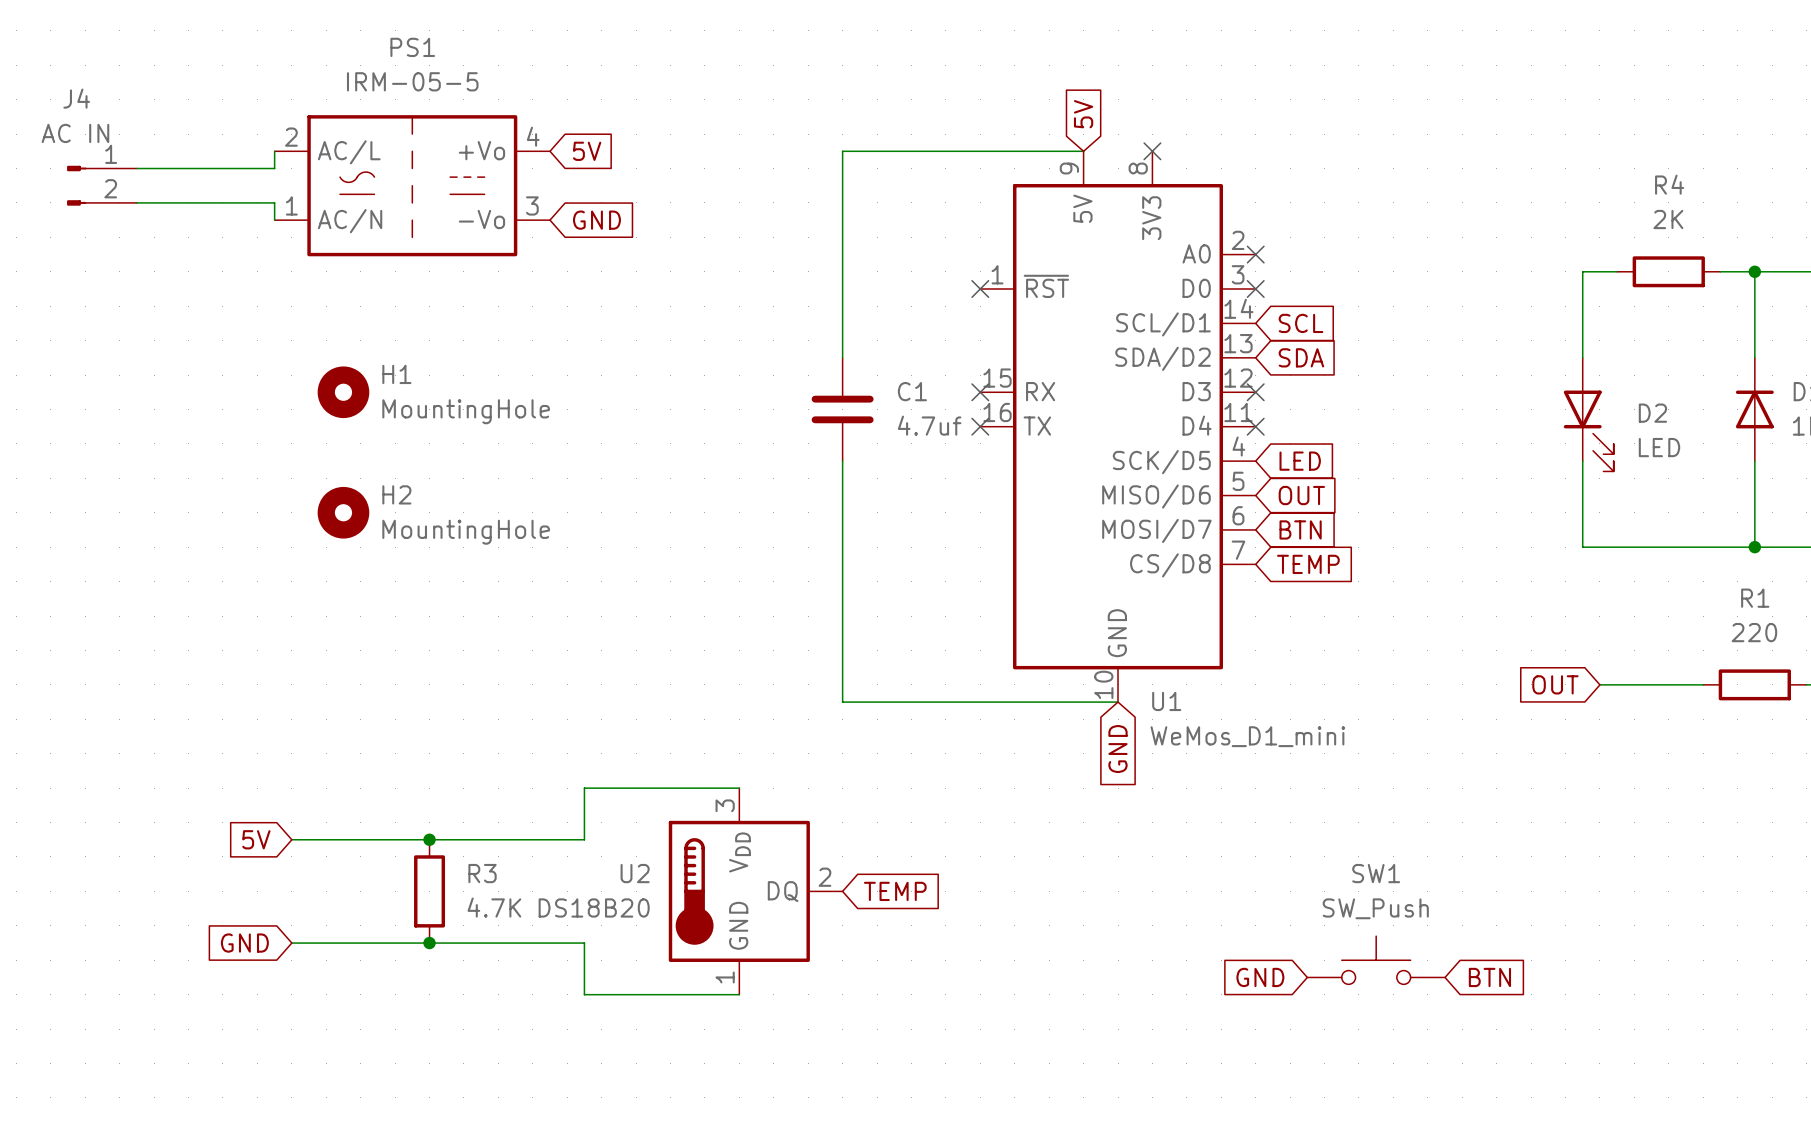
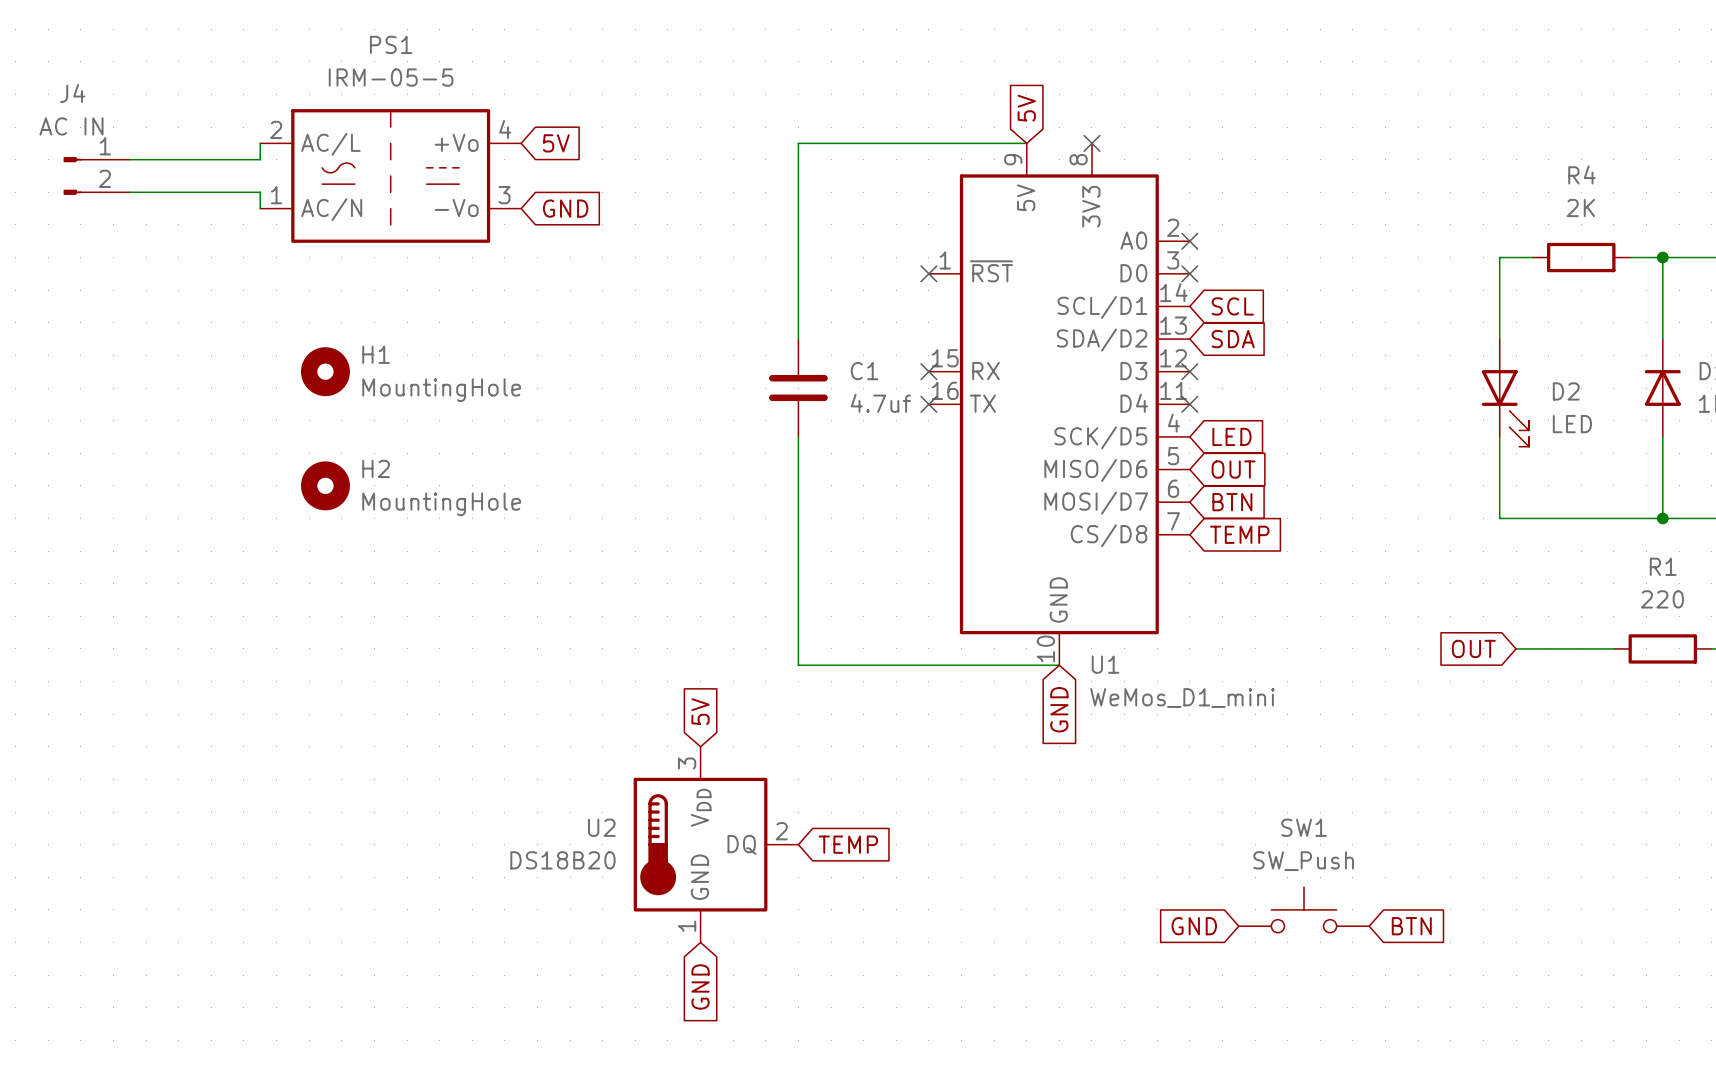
global label: none -> 5V (700, 711)
wire: (739, 788) (584, 788) (584, 839) (291, 839) -> none
global label: 5V (256, 839) -> none
junction: (429, 839) -> none
R3: 4.7K (429, 891) -> none
global label: GND (244, 943) -> none
wire: (291, 943) (584, 943) (584, 994) (739, 994) -> none
junction: (429, 943) -> none
global label: none -> GND (700, 987)

